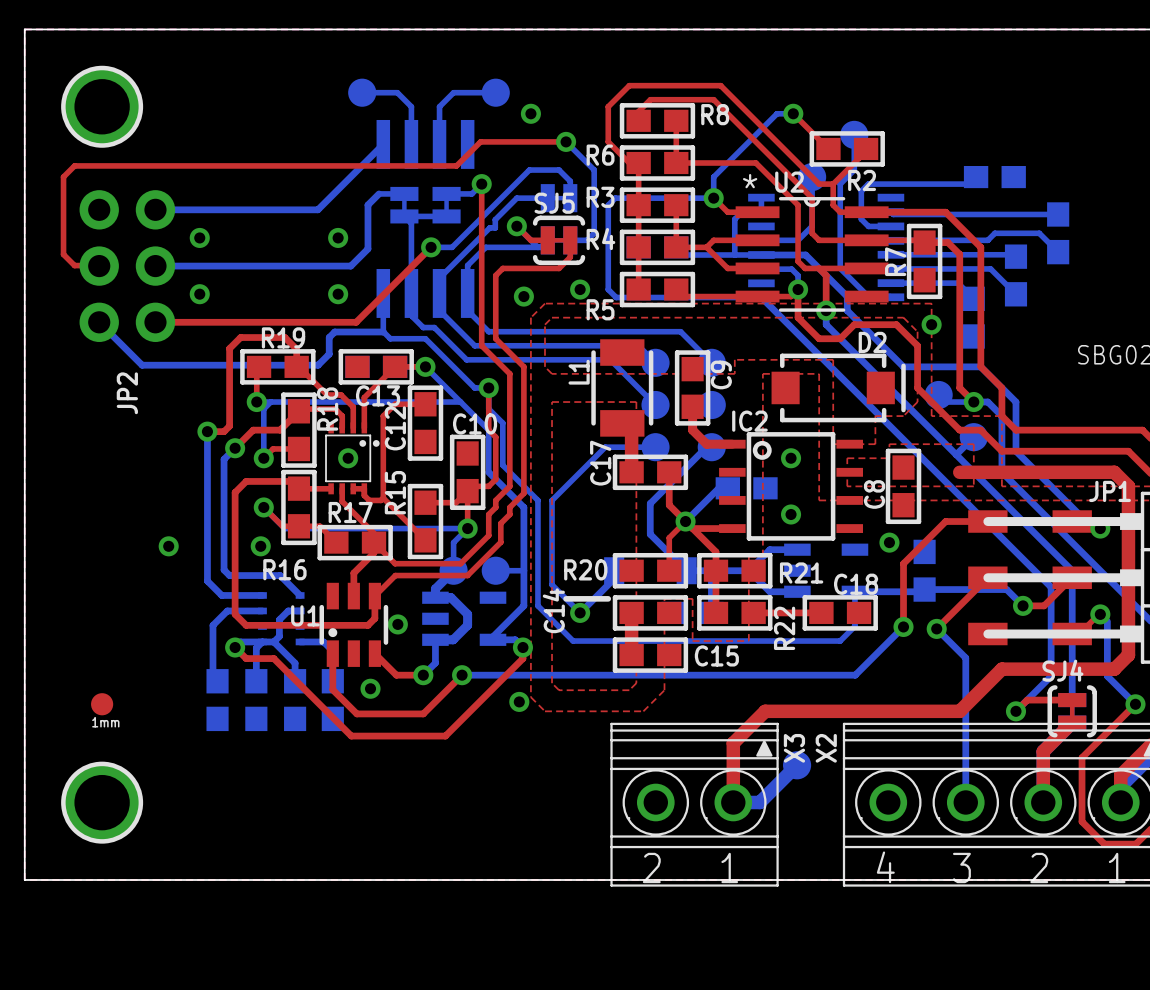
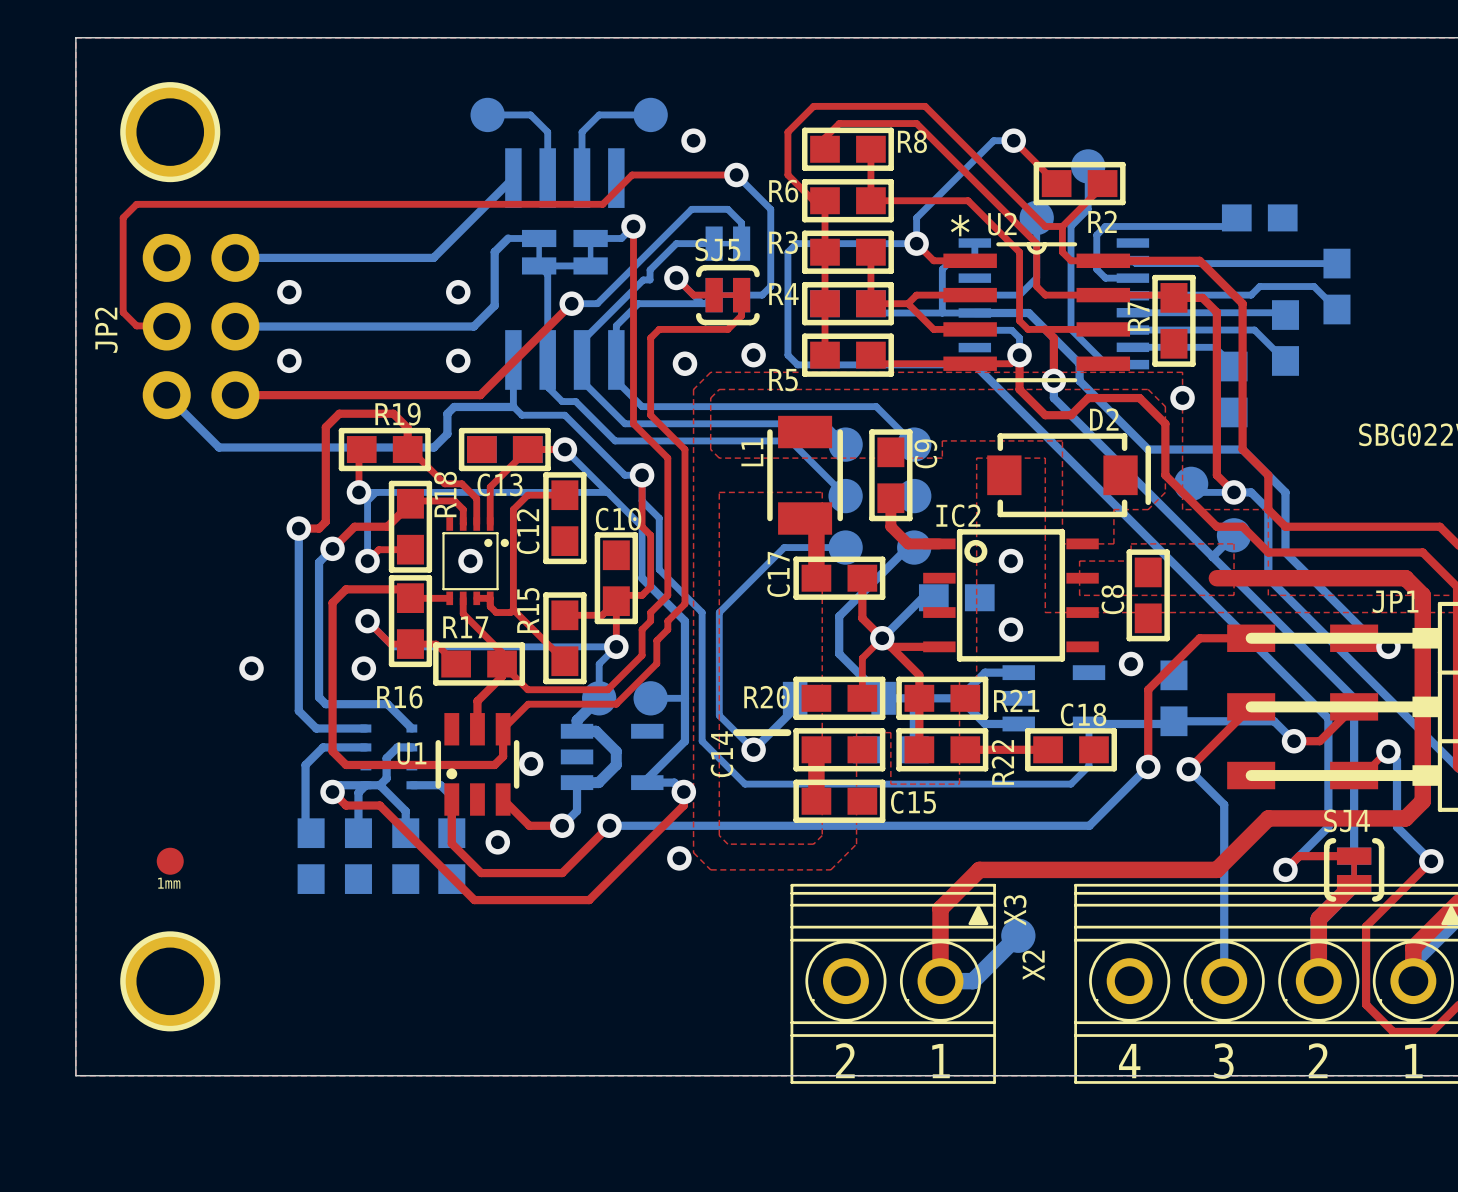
JP2 name position: JP2 (127, 393) -> JP2 (106, 330)
X2 name position: X2 (826, 748) -> X2 (1033, 965)

